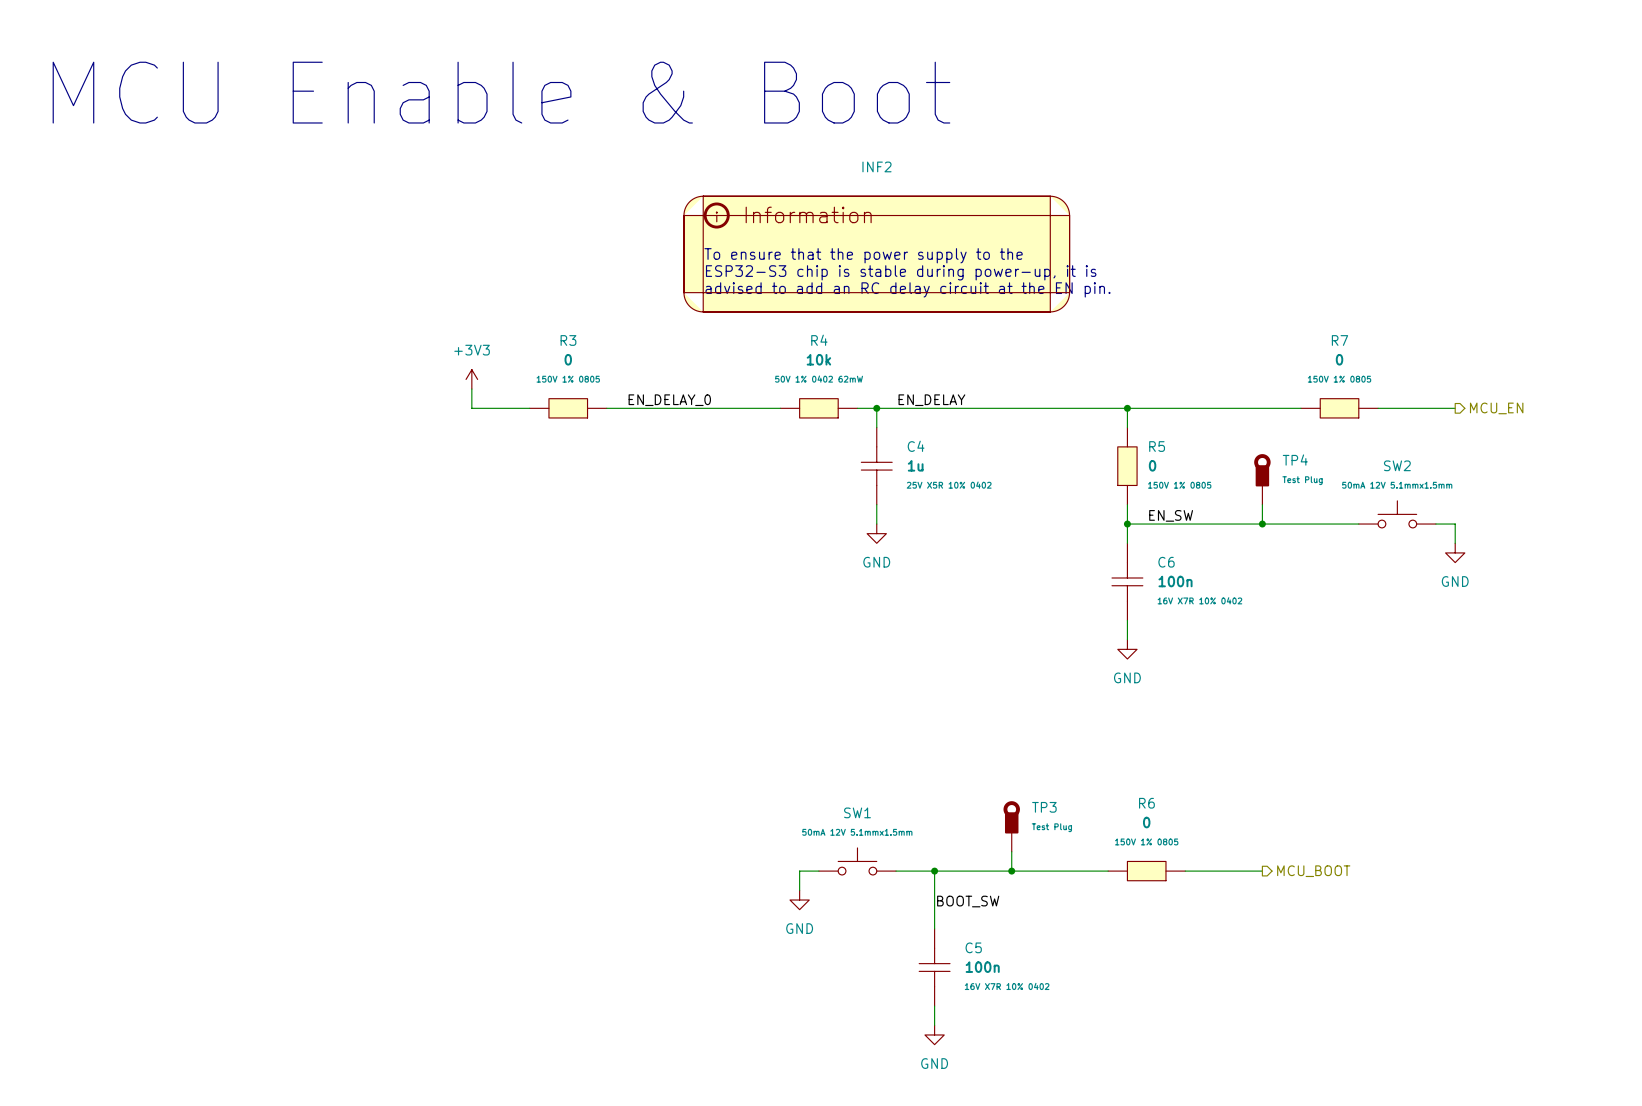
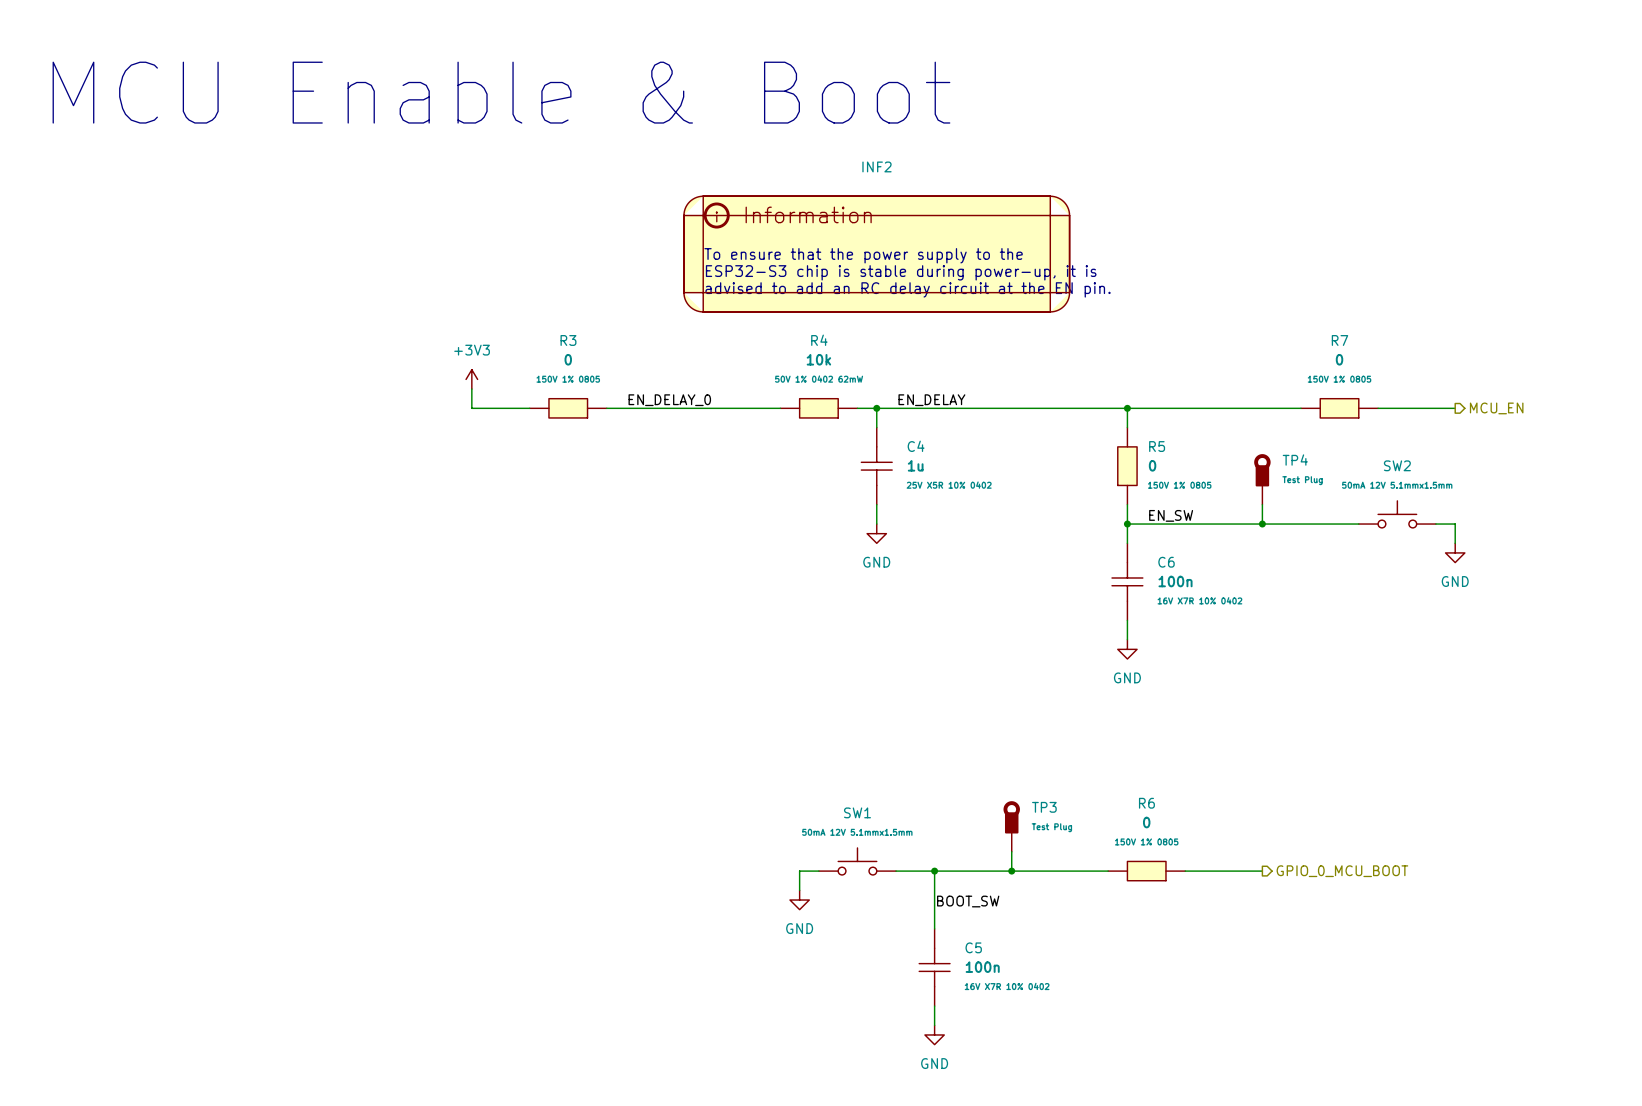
hierarchical label: MCU_BOOT (1313, 871) -> GPIO_0_MCU_BOOT (1342, 871)

